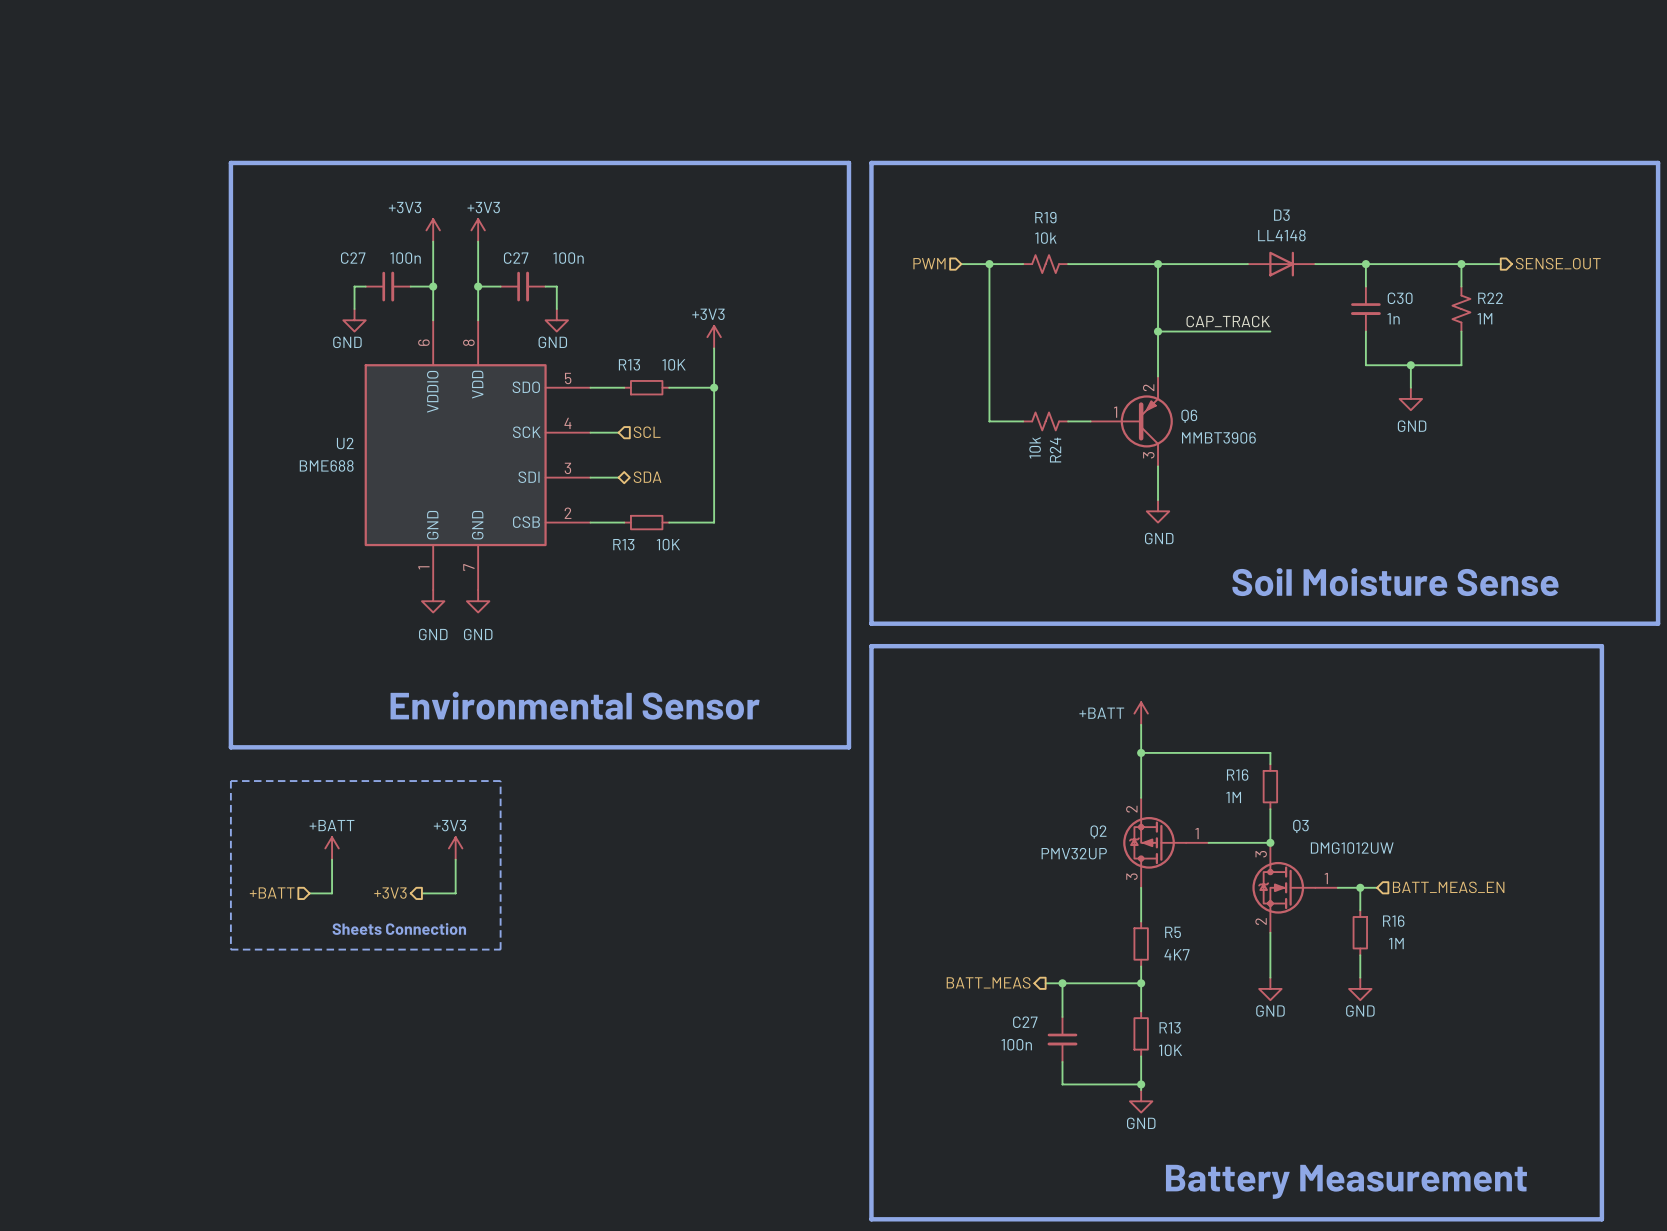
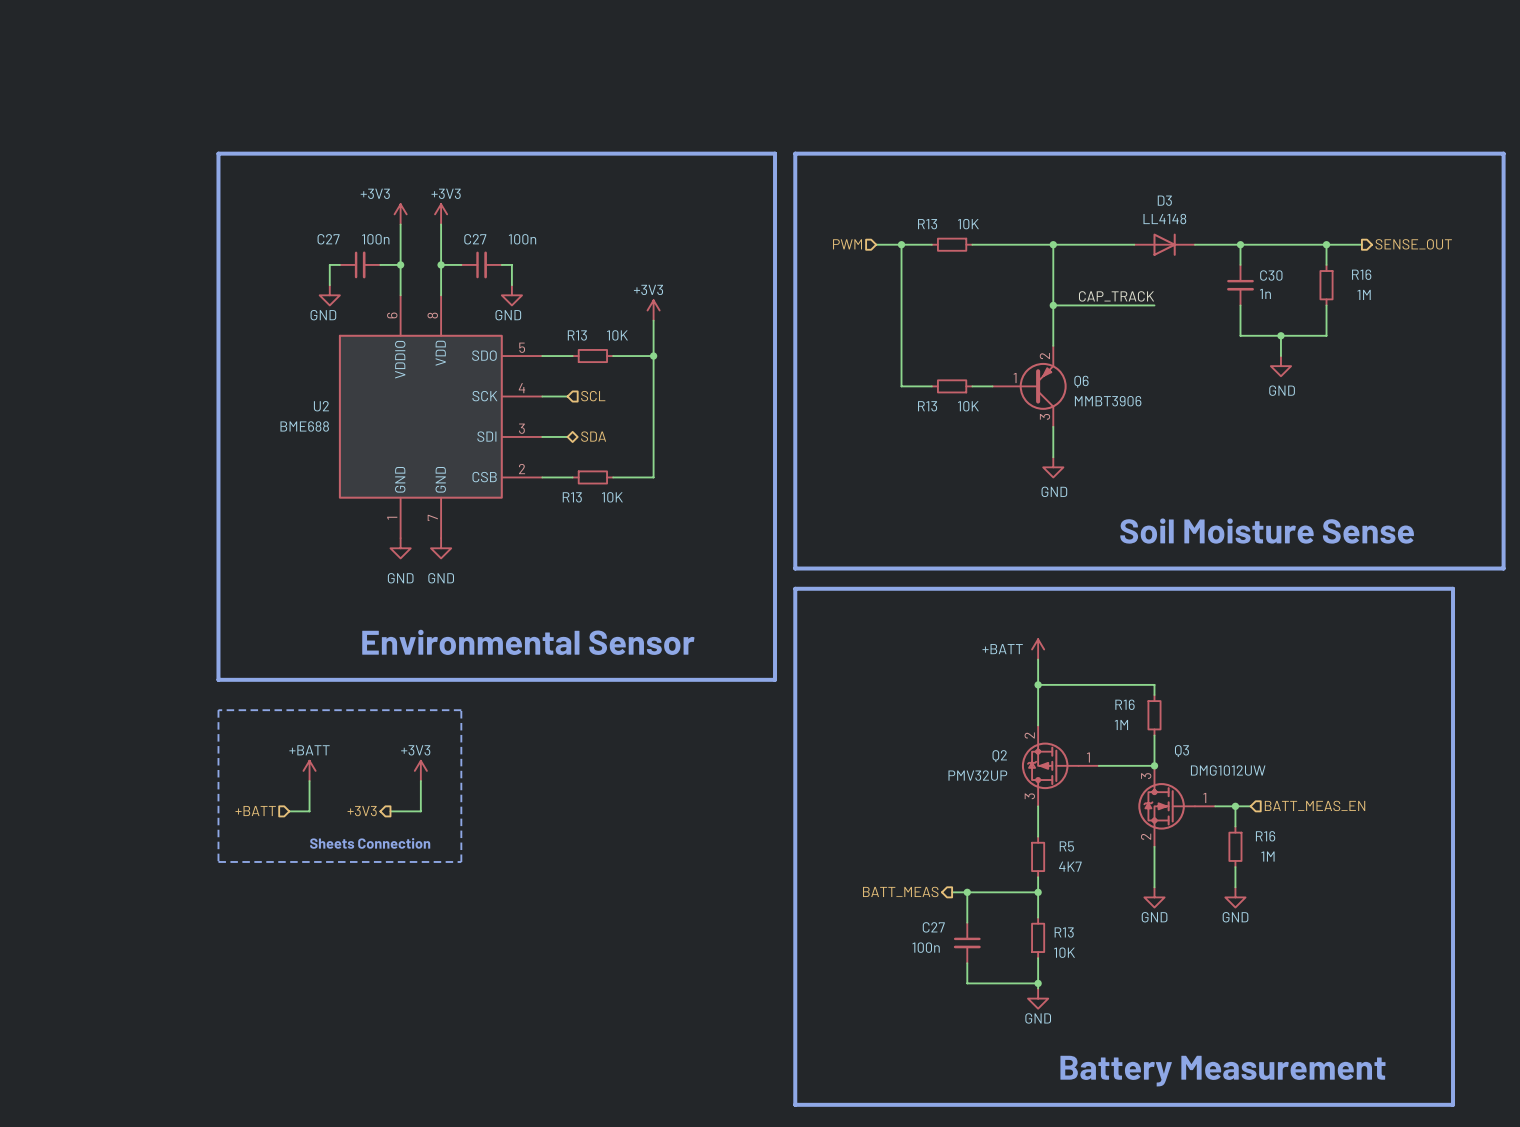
R19: 10k (1045, 264) -> none
R13: none -> 10K (952, 244)
R22: 1M (1461, 309) -> none
R16: none -> 1M (1326, 285)
R24: 10k (1045, 421) -> none
R13: none -> 10K (952, 386)

